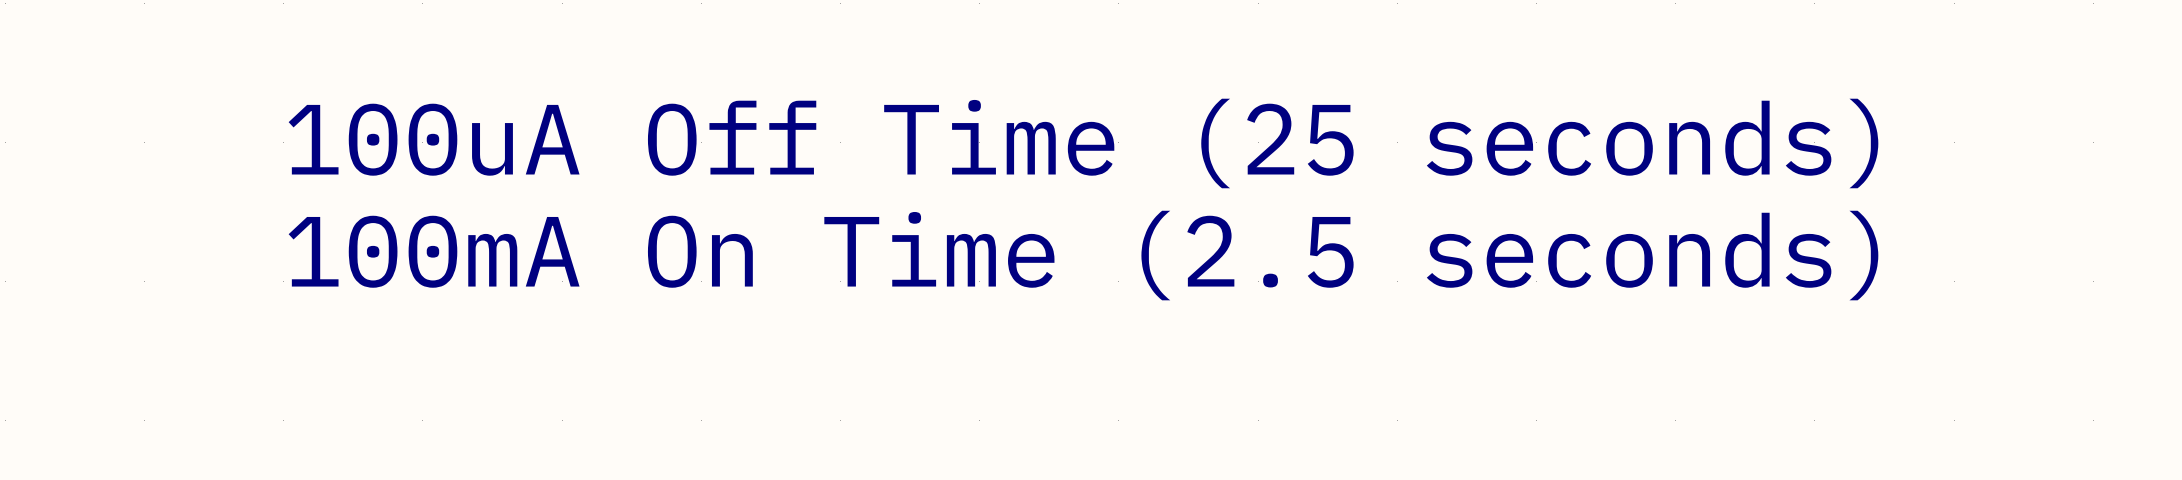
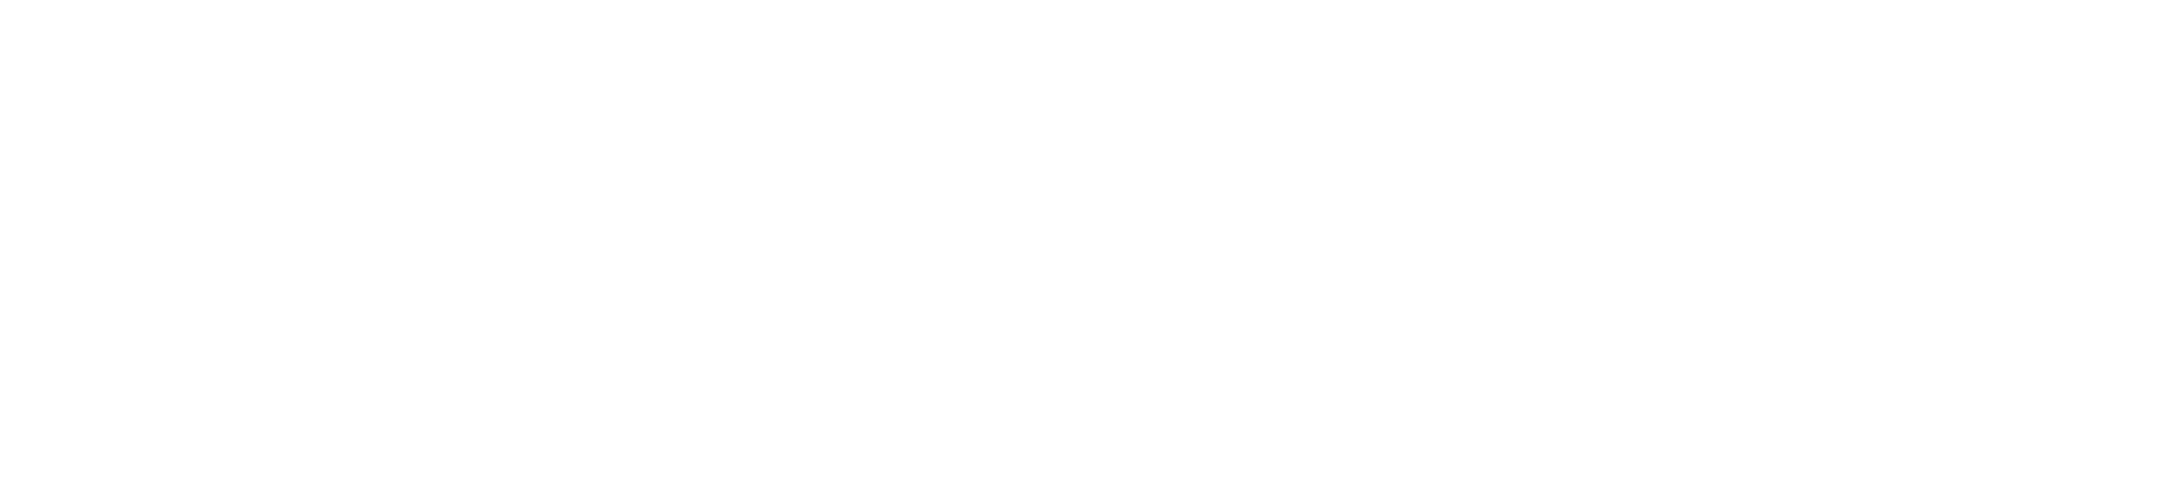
text: 100uA Off Time (25 seconds) (1083, 143) -> none
text: 100mA On Time (2.5 seconds) (1083, 255) -> none

